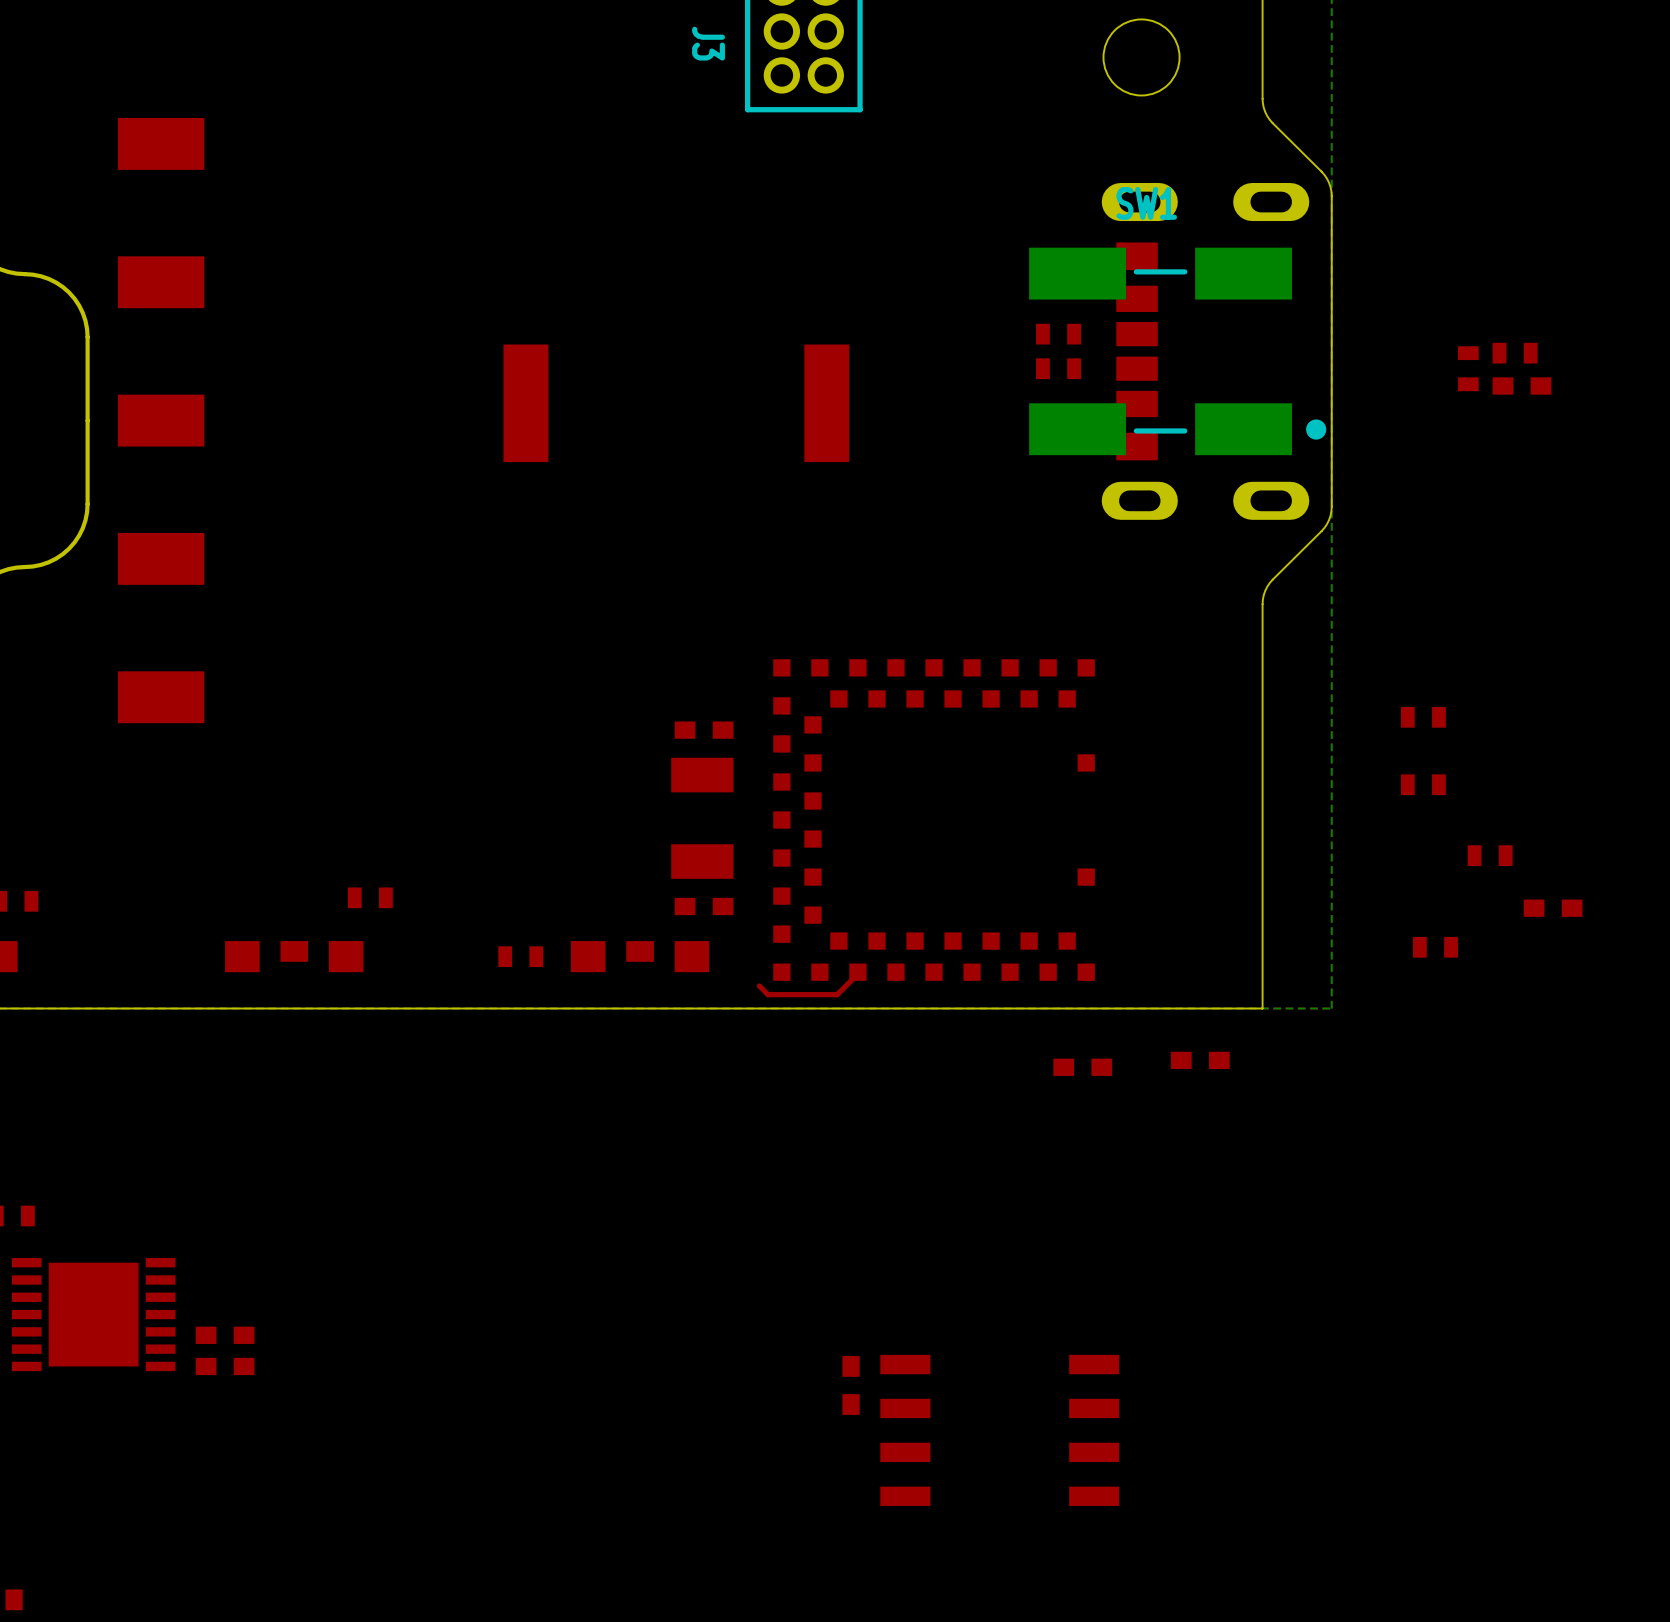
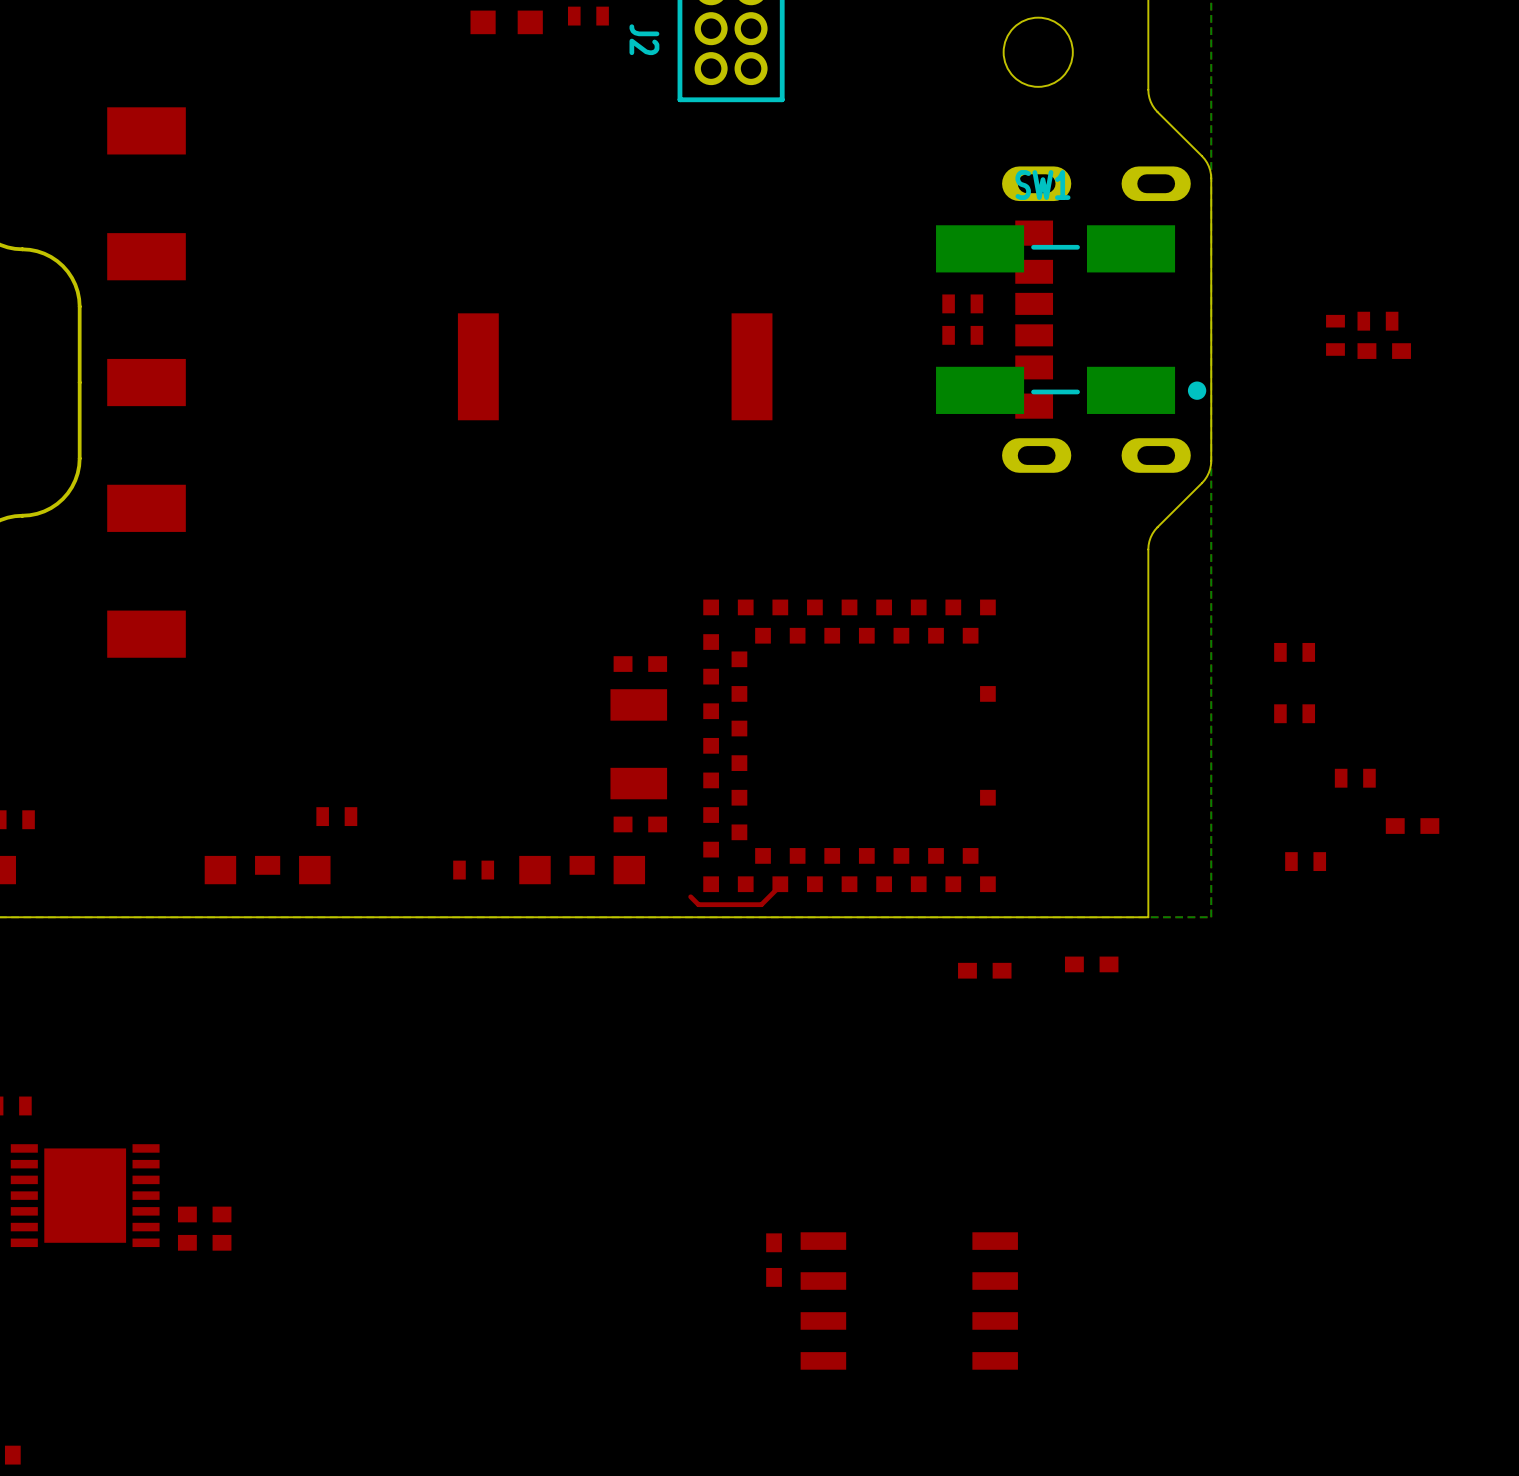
part: none -> (588, 16)
part: none -> (506, 22)
J3 name: J3 (708, 43) -> J2 (644, 39)

